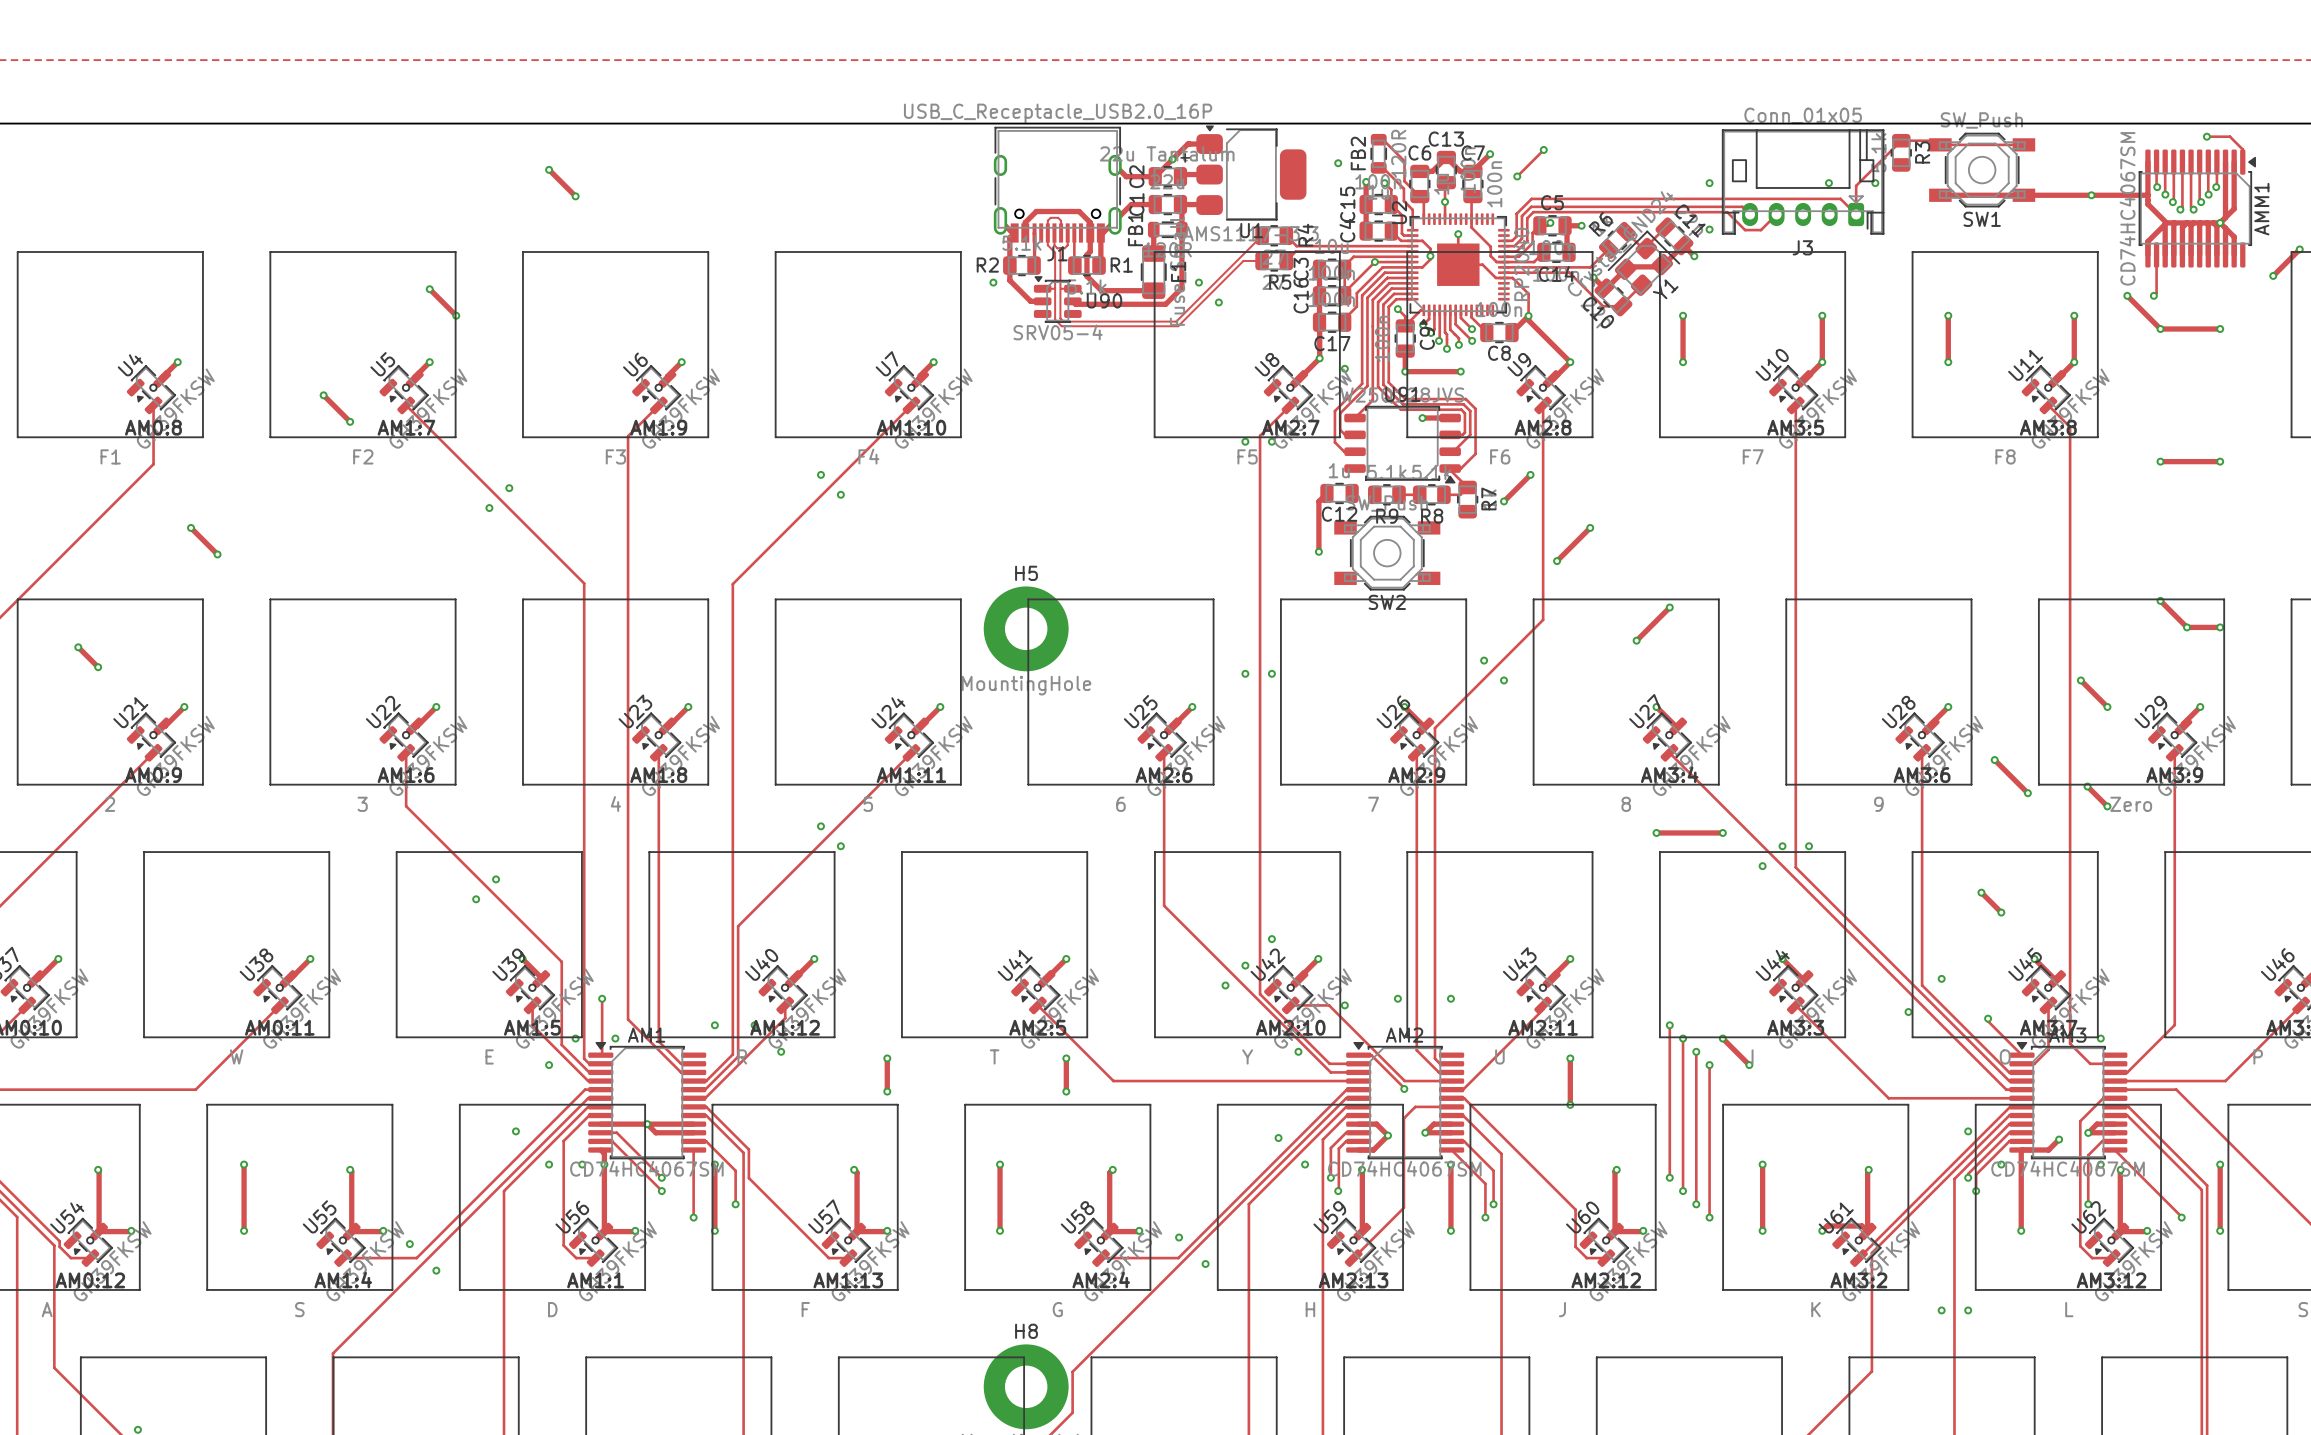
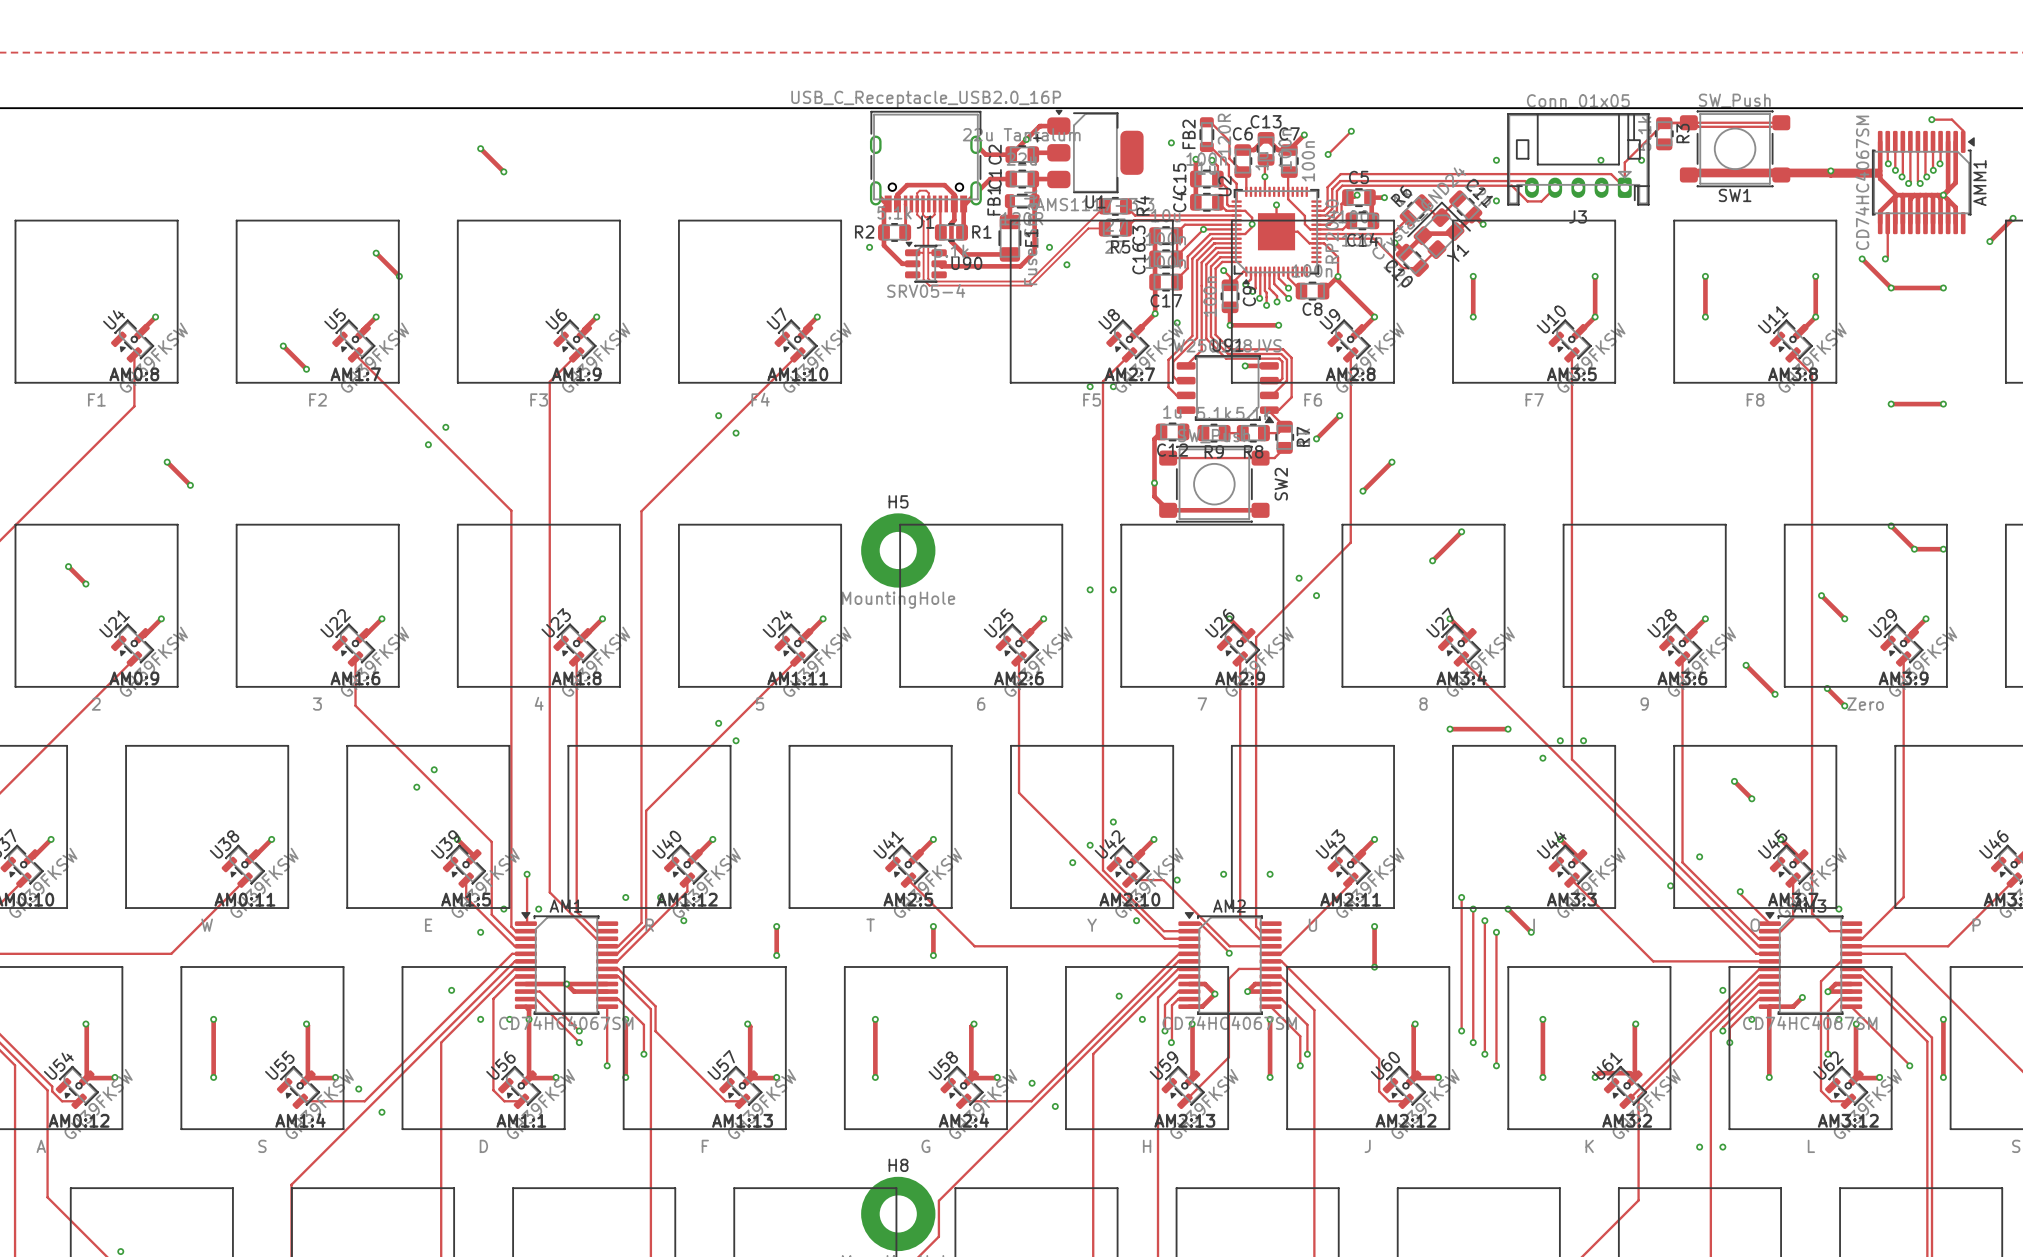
SW1 footprint: [1929, 132, 2036, 208] -> [1679, 110, 1791, 188]
track: none -> (1664, 122) (1781, 122)
track: none -> (1688, 174) (1880, 175)
track: none -> (1284, 447) (1274, 458) (1168, 458)
SW2 footprint: [1334, 515, 1441, 591] -> [1159, 445, 1270, 523]
track: none -> (1154, 483) (1154, 496) (1168, 510) (1260, 510)
SW2 name position: SW2 (1387, 602) -> SW2 (1281, 484)

